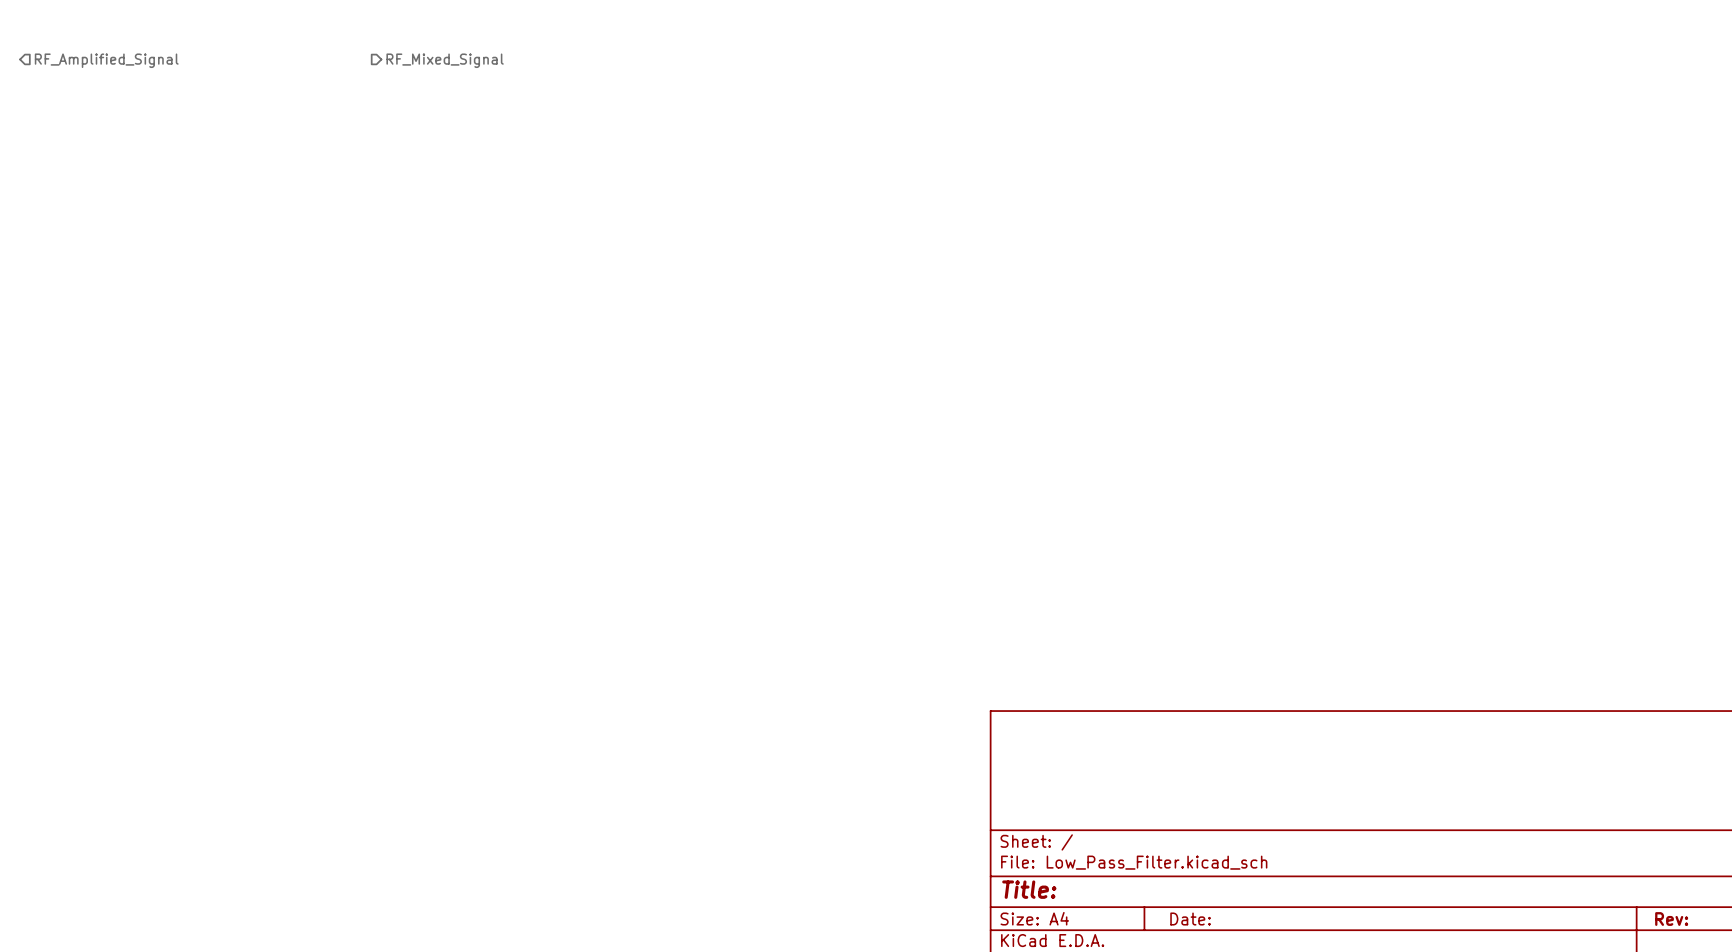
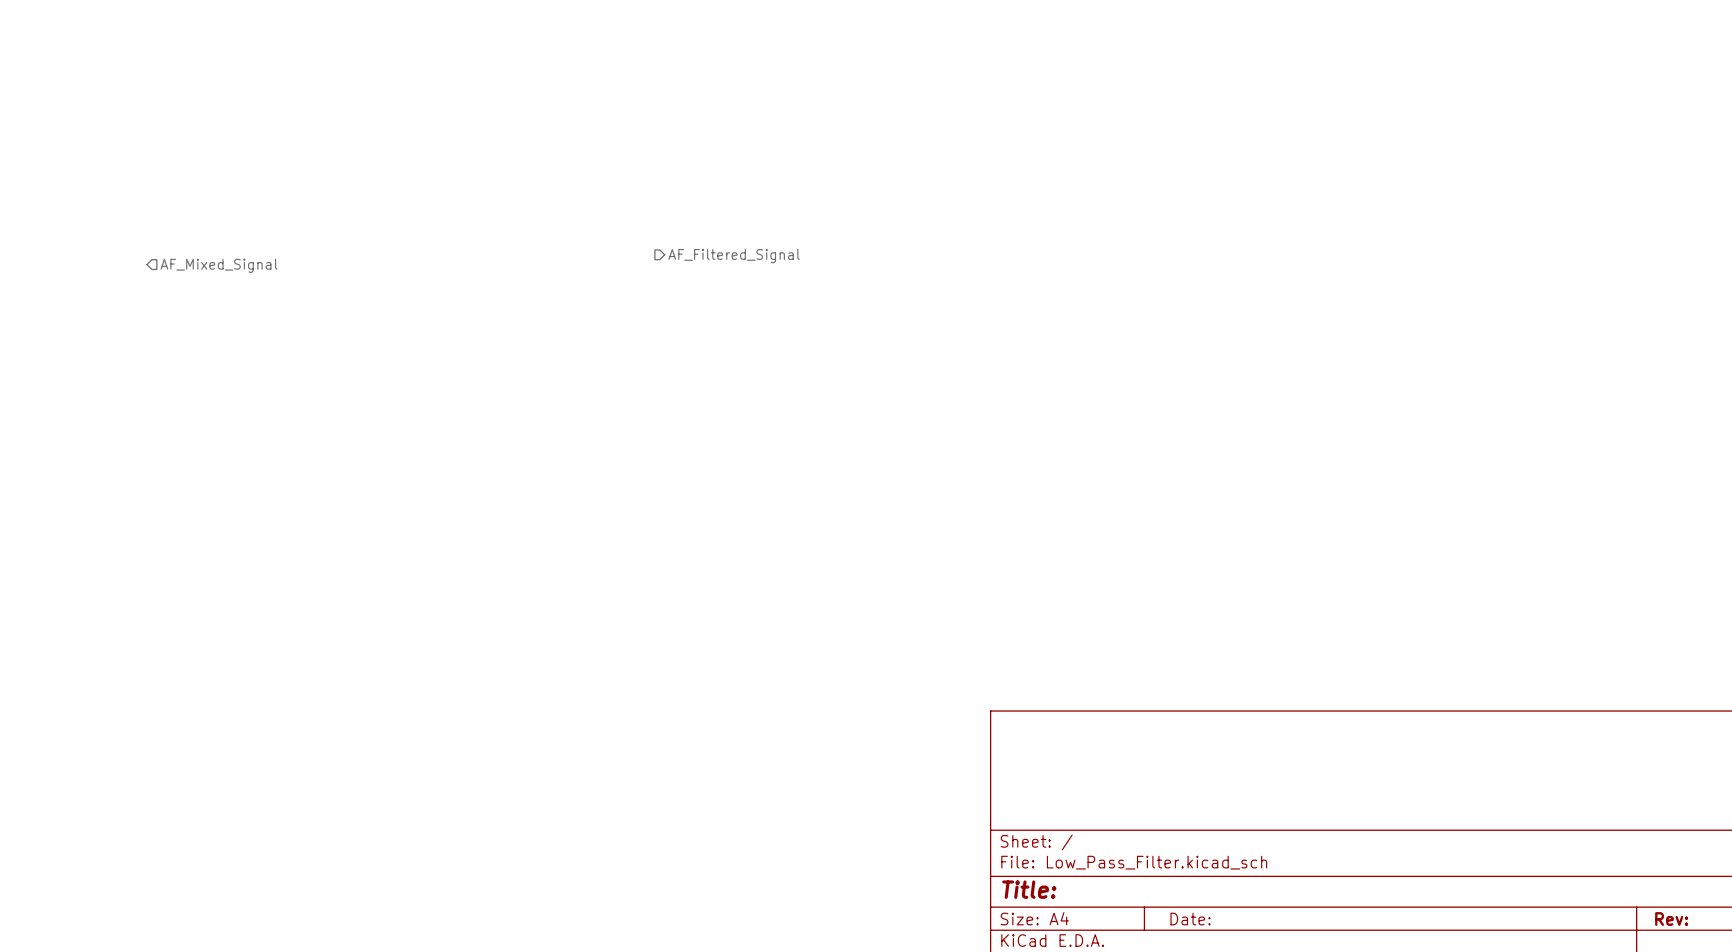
hierarchical label: RF_Amplified_Signal (106, 60) -> none
hierarchical label: RF_Mixed_Signal (445, 60) -> none
hierarchical label: none -> AF_Filtered_Signal (734, 256)
hierarchical label: none -> AF_Mixed_Signal (219, 265)

